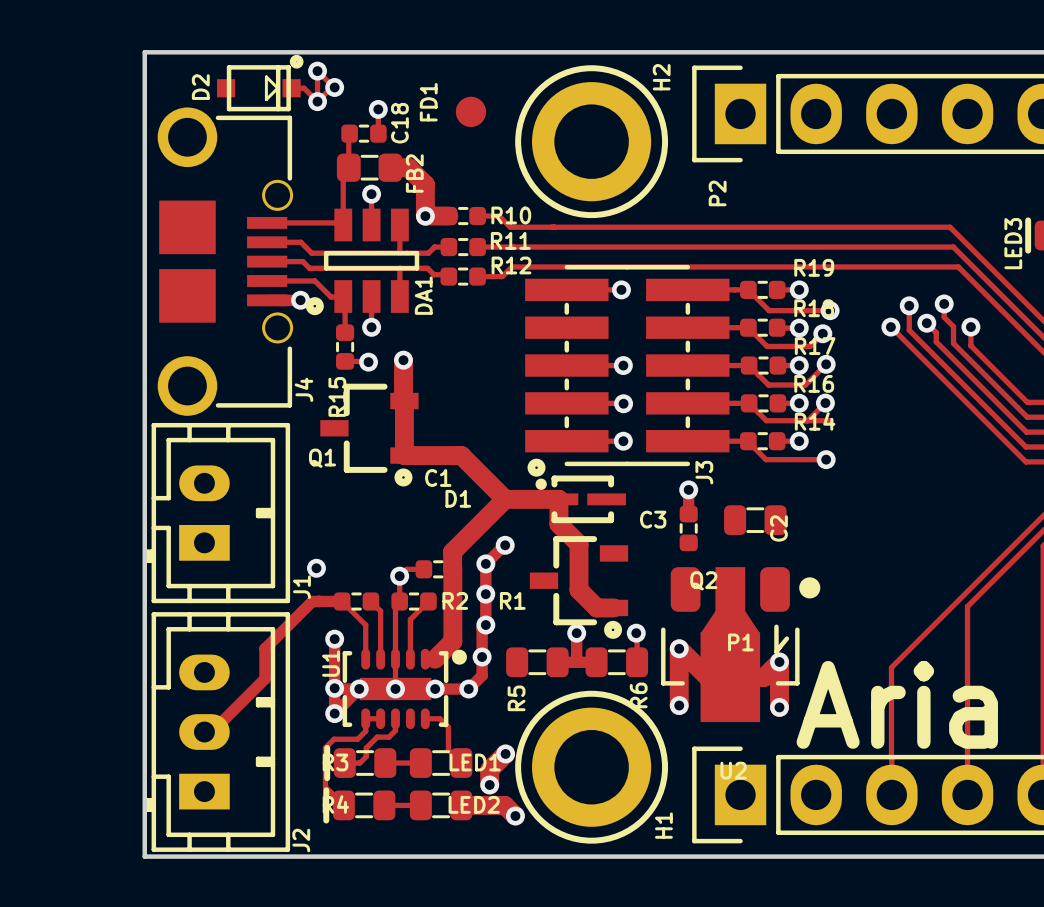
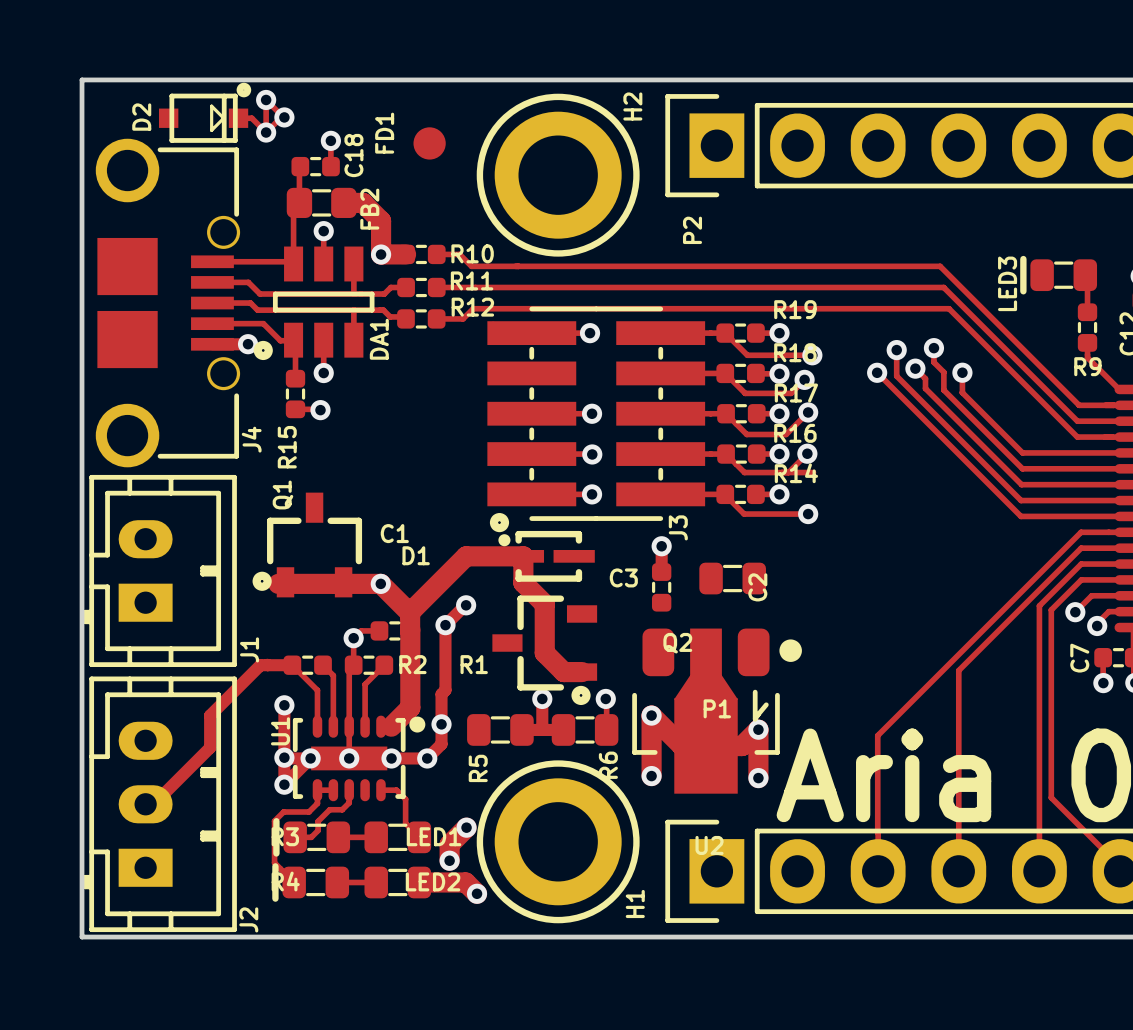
track: (403, 360) (404, 455) (461, 455) (505, 499) -> none
via: (403, 360) -> none
Q1 rotation: 0° (369, 435) -> 90° clockwise (307, 545)
track: none -> (278, 583) (380, 583) (410, 613)
via: none -> (380, 583)
via: (316, 568) -> none
via: (485, 594) -> none
via: (485, 625) -> none

